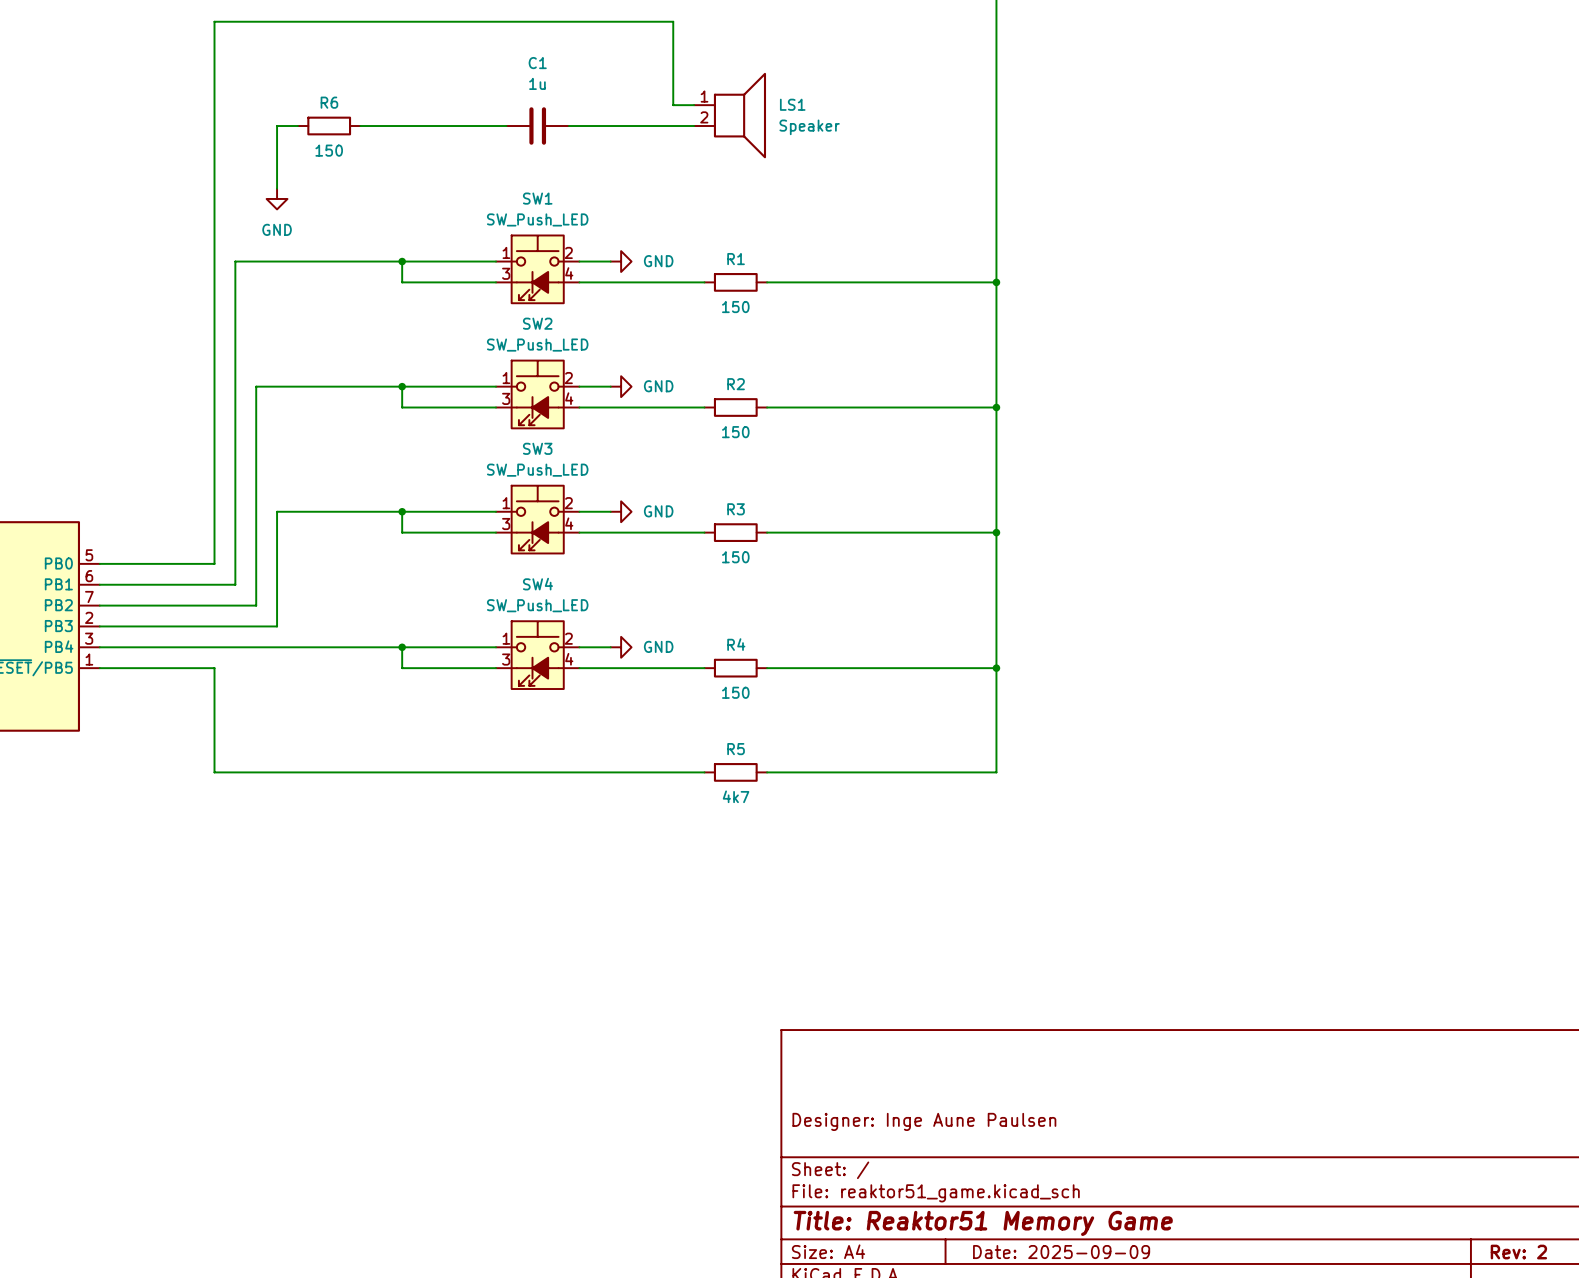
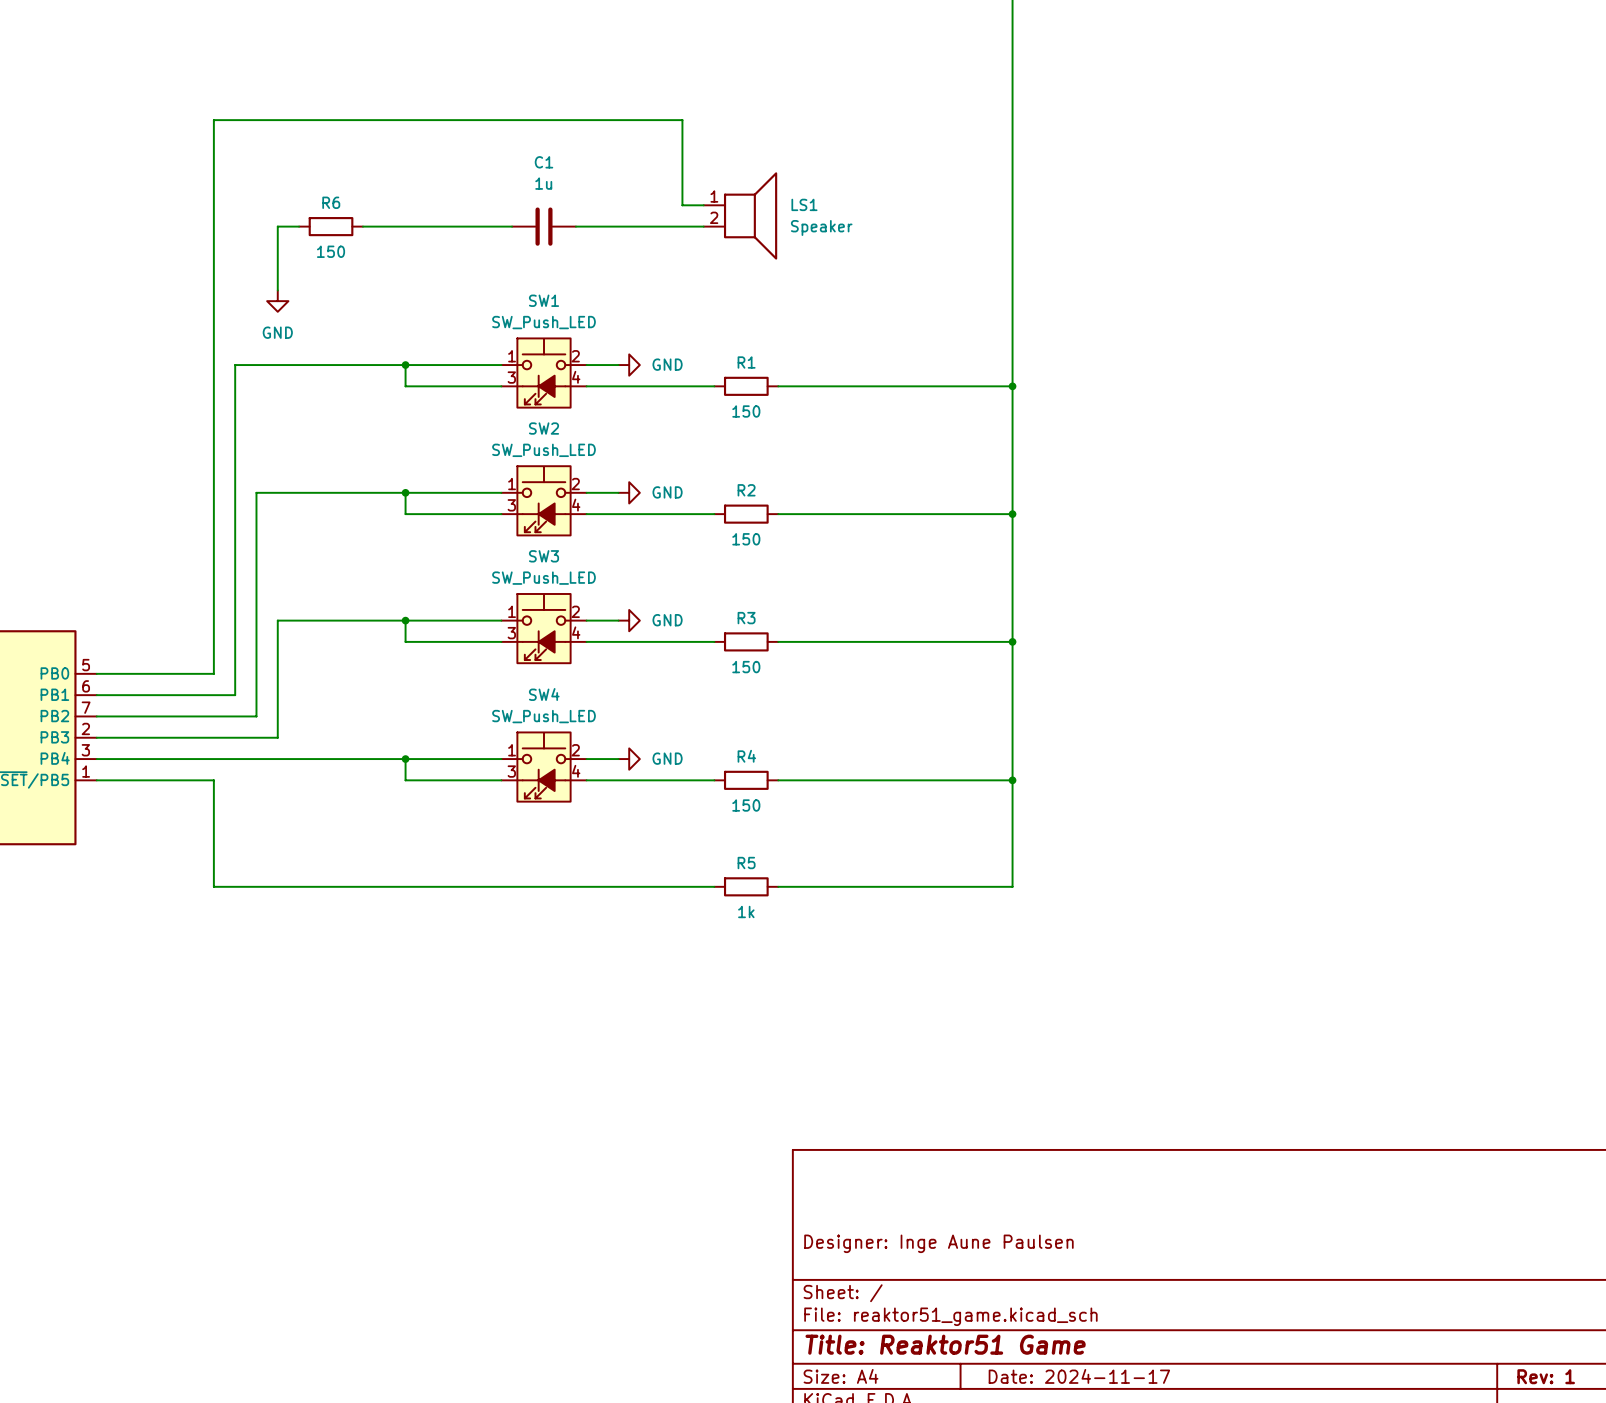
R5 value: 4k7 (736, 796) -> 1k (746, 911)
title block: Title: Reaktor51 Memory Game (983, 1223) -> Title: Reaktor51 Game (945, 1344)
title block: Date: 2025-09-09 (1061, 1252) -> Date: 2024-11-17 (1079, 1376)
title block: Rev: 2 (1518, 1252) -> Rev: 1 (1546, 1376)

